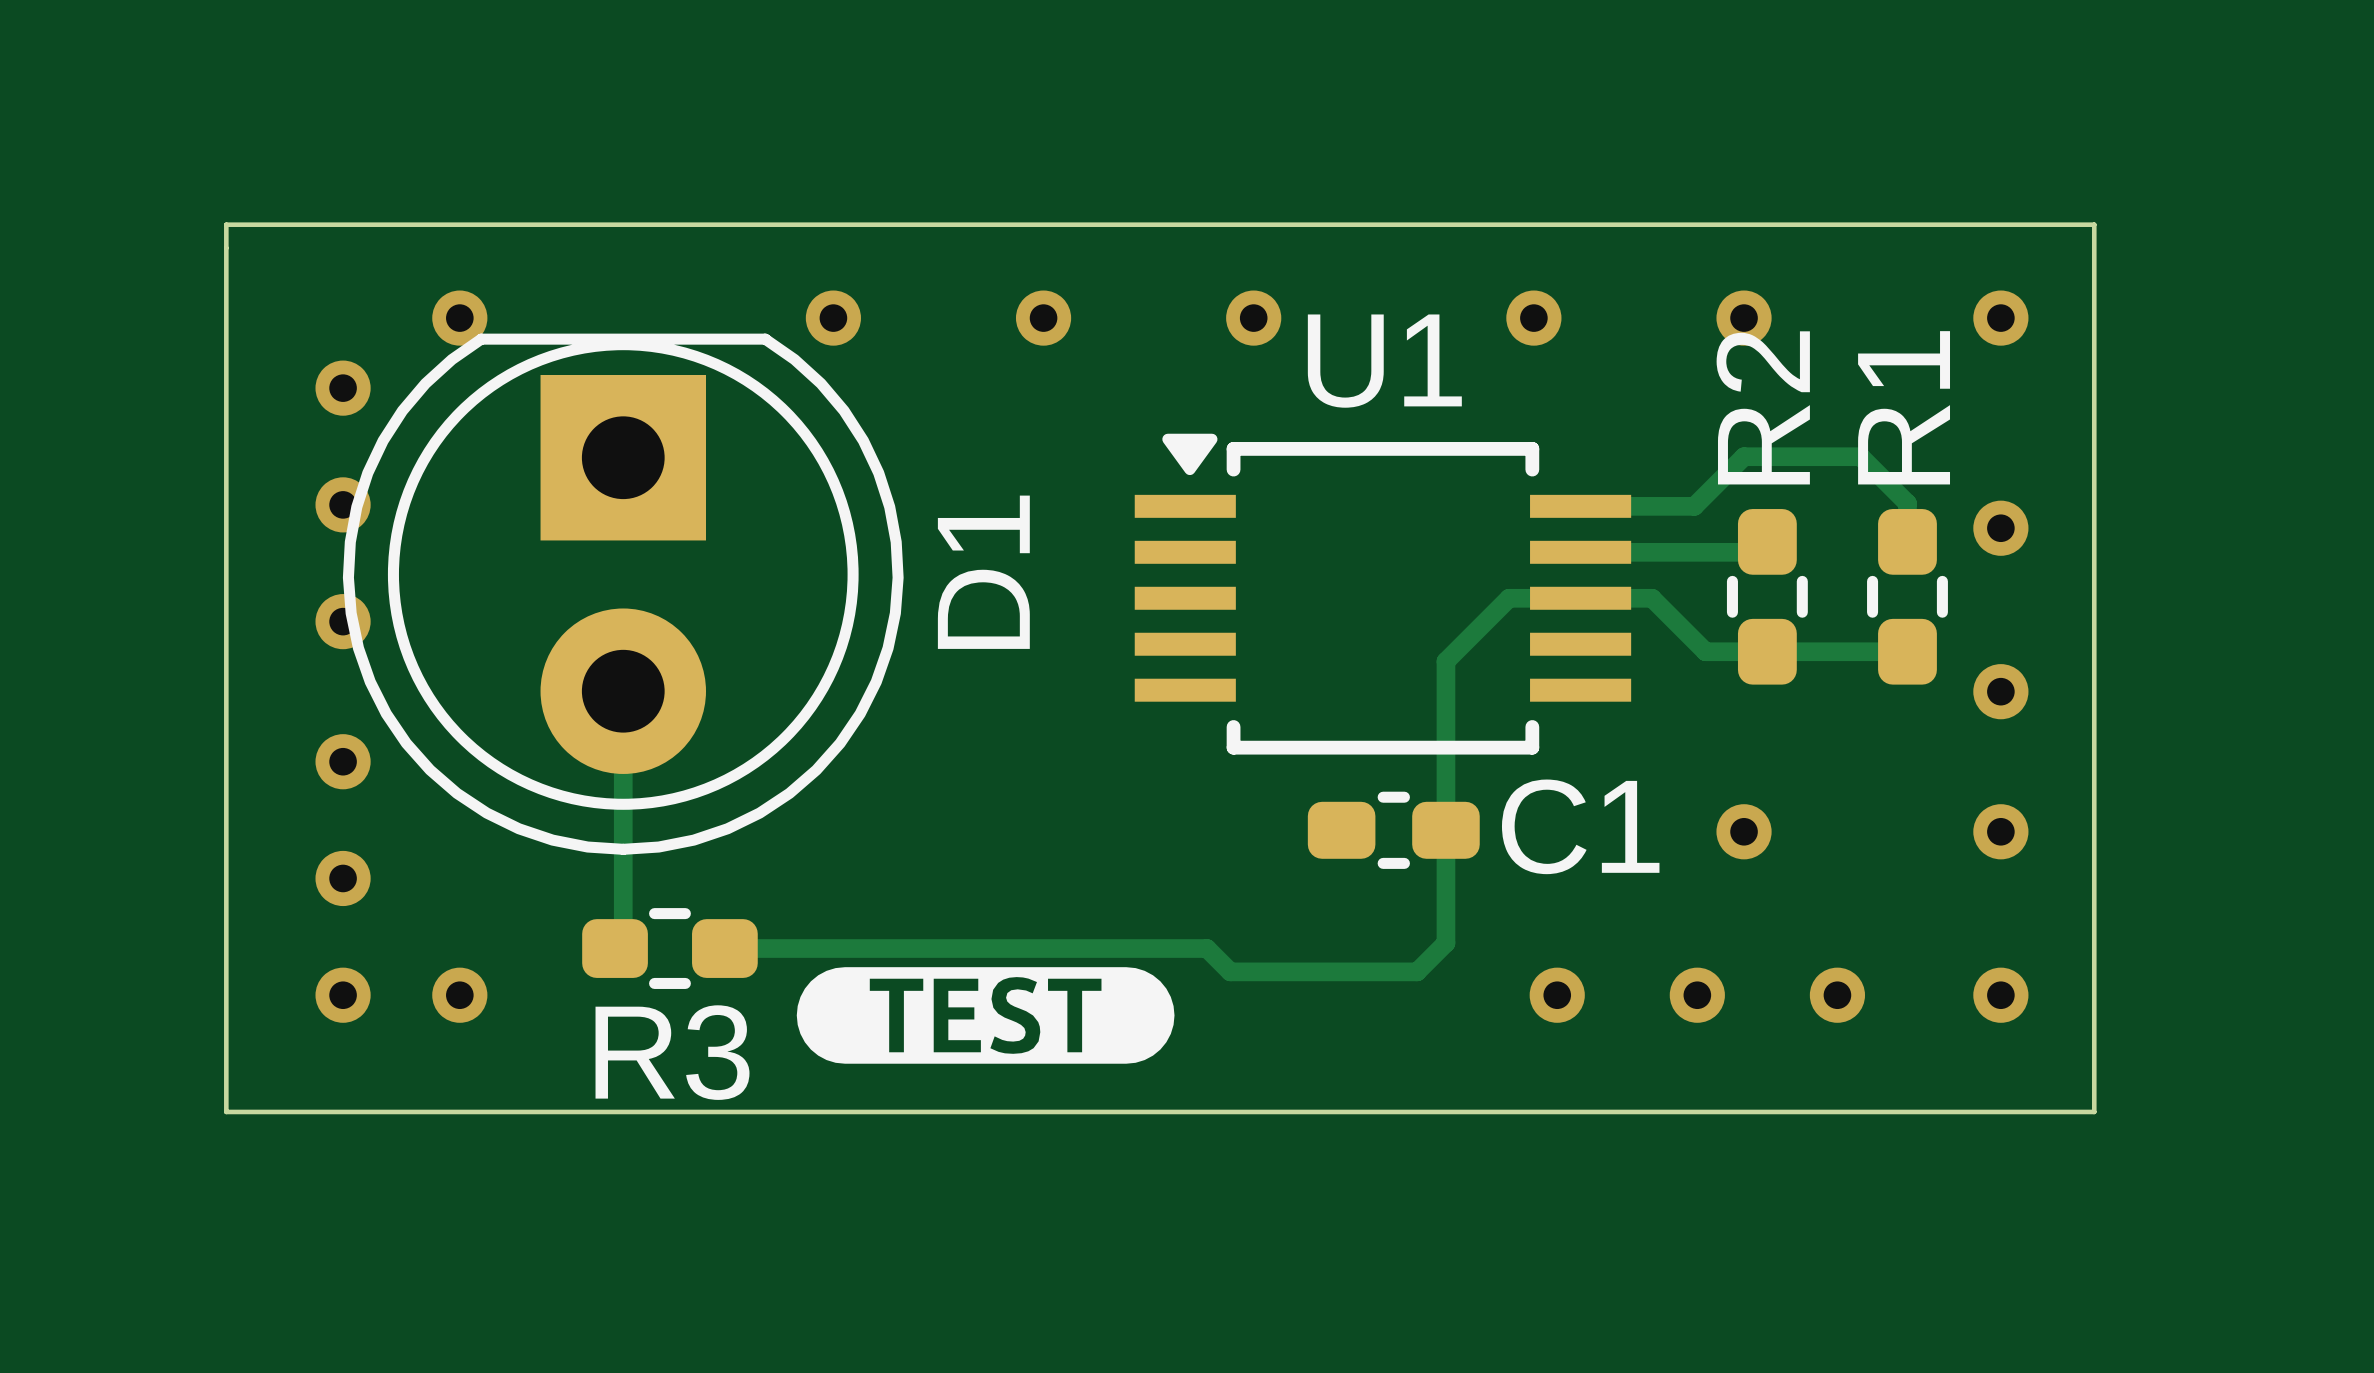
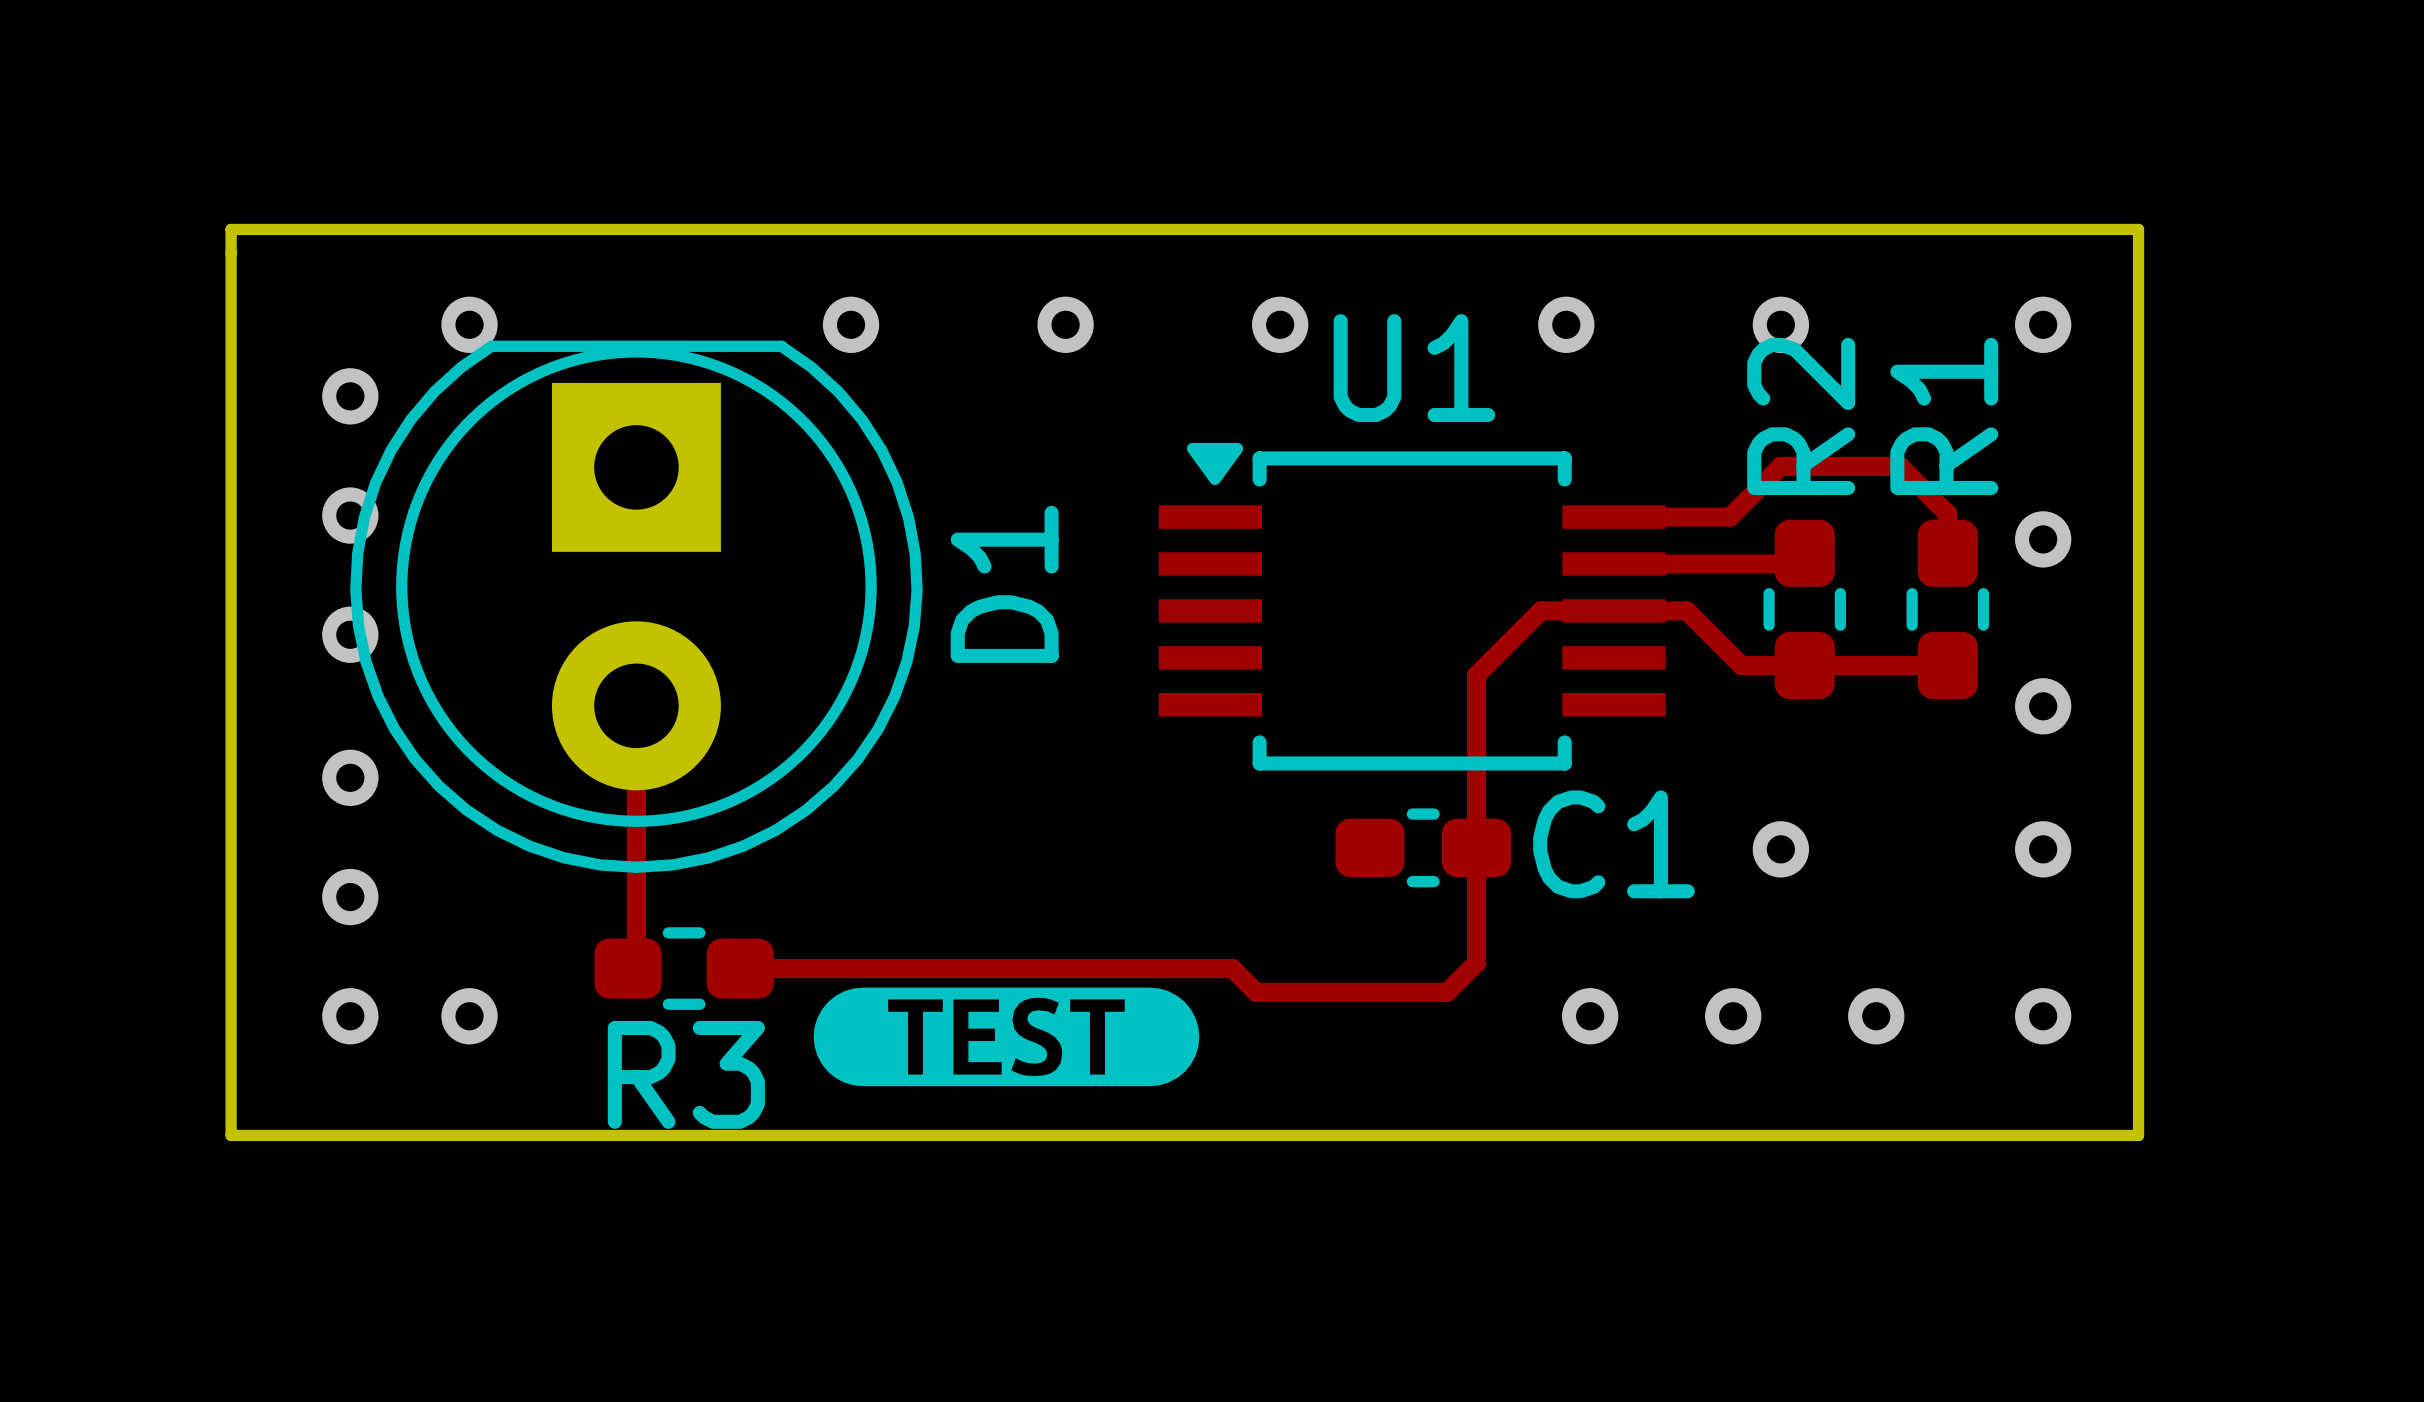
board edge width: thin (226, 224) (226, 1111) (2094, 1111) (2094, 224) (226, 224) -> thick (231, 229) (231, 1135) (2138, 1135) (2138, 229) (231, 229)

